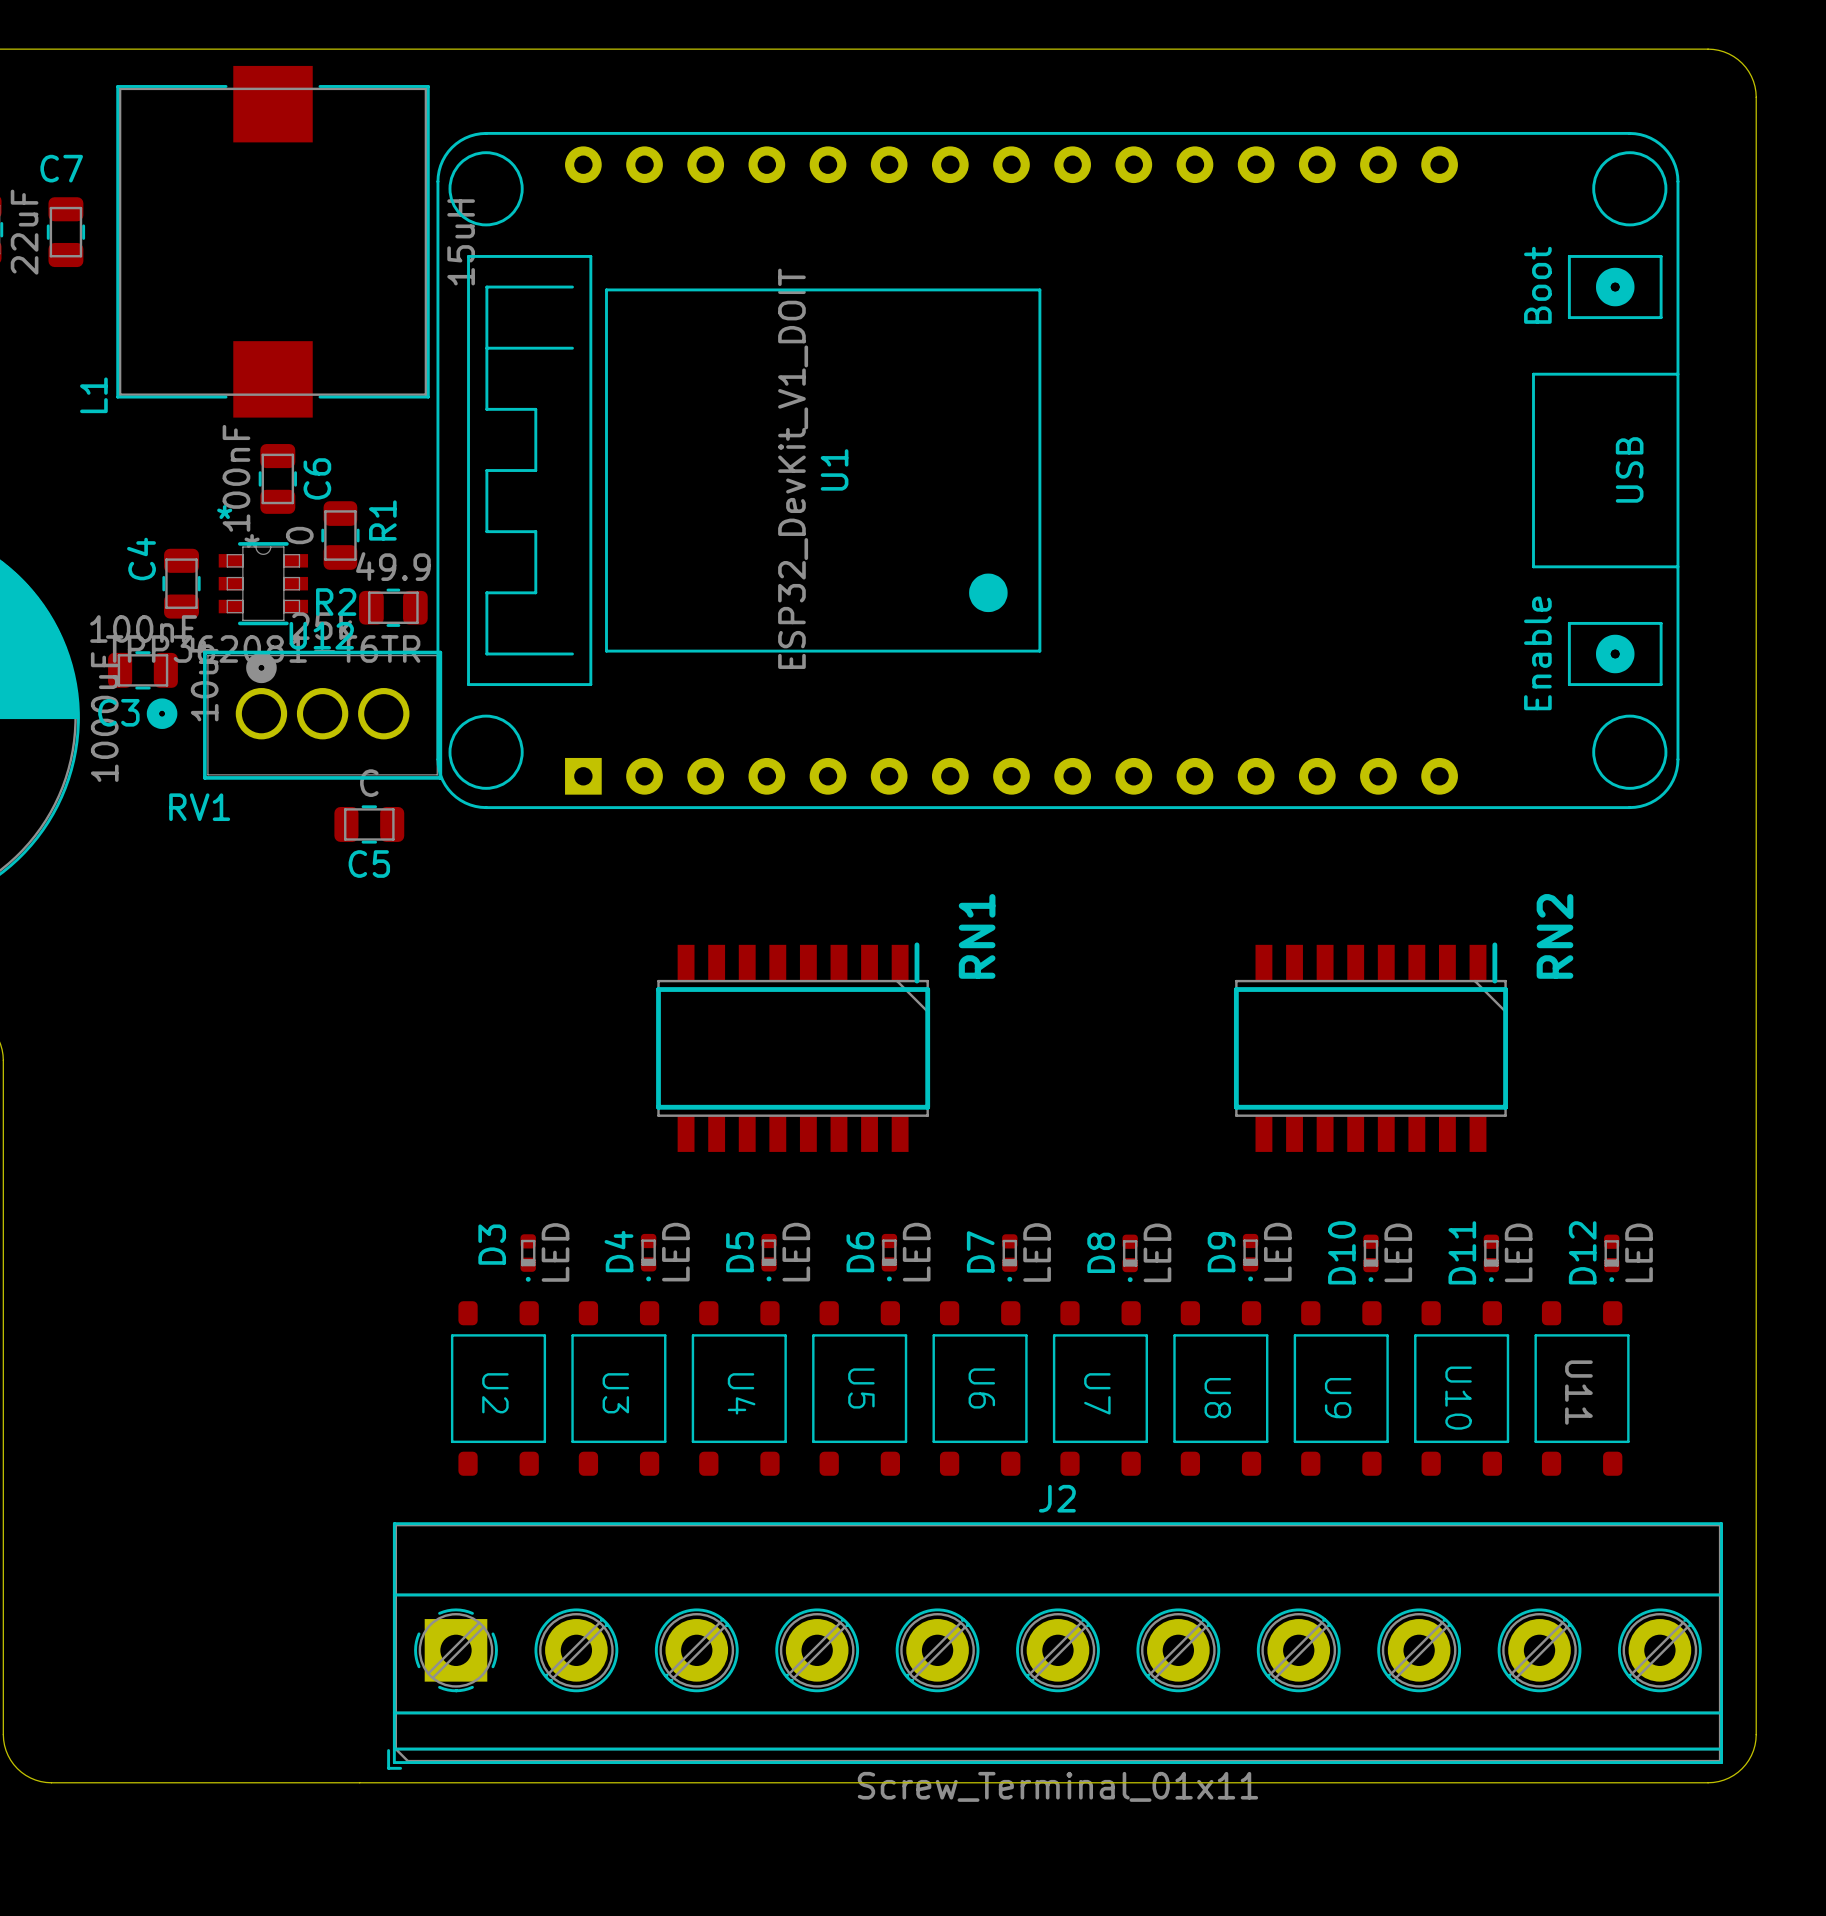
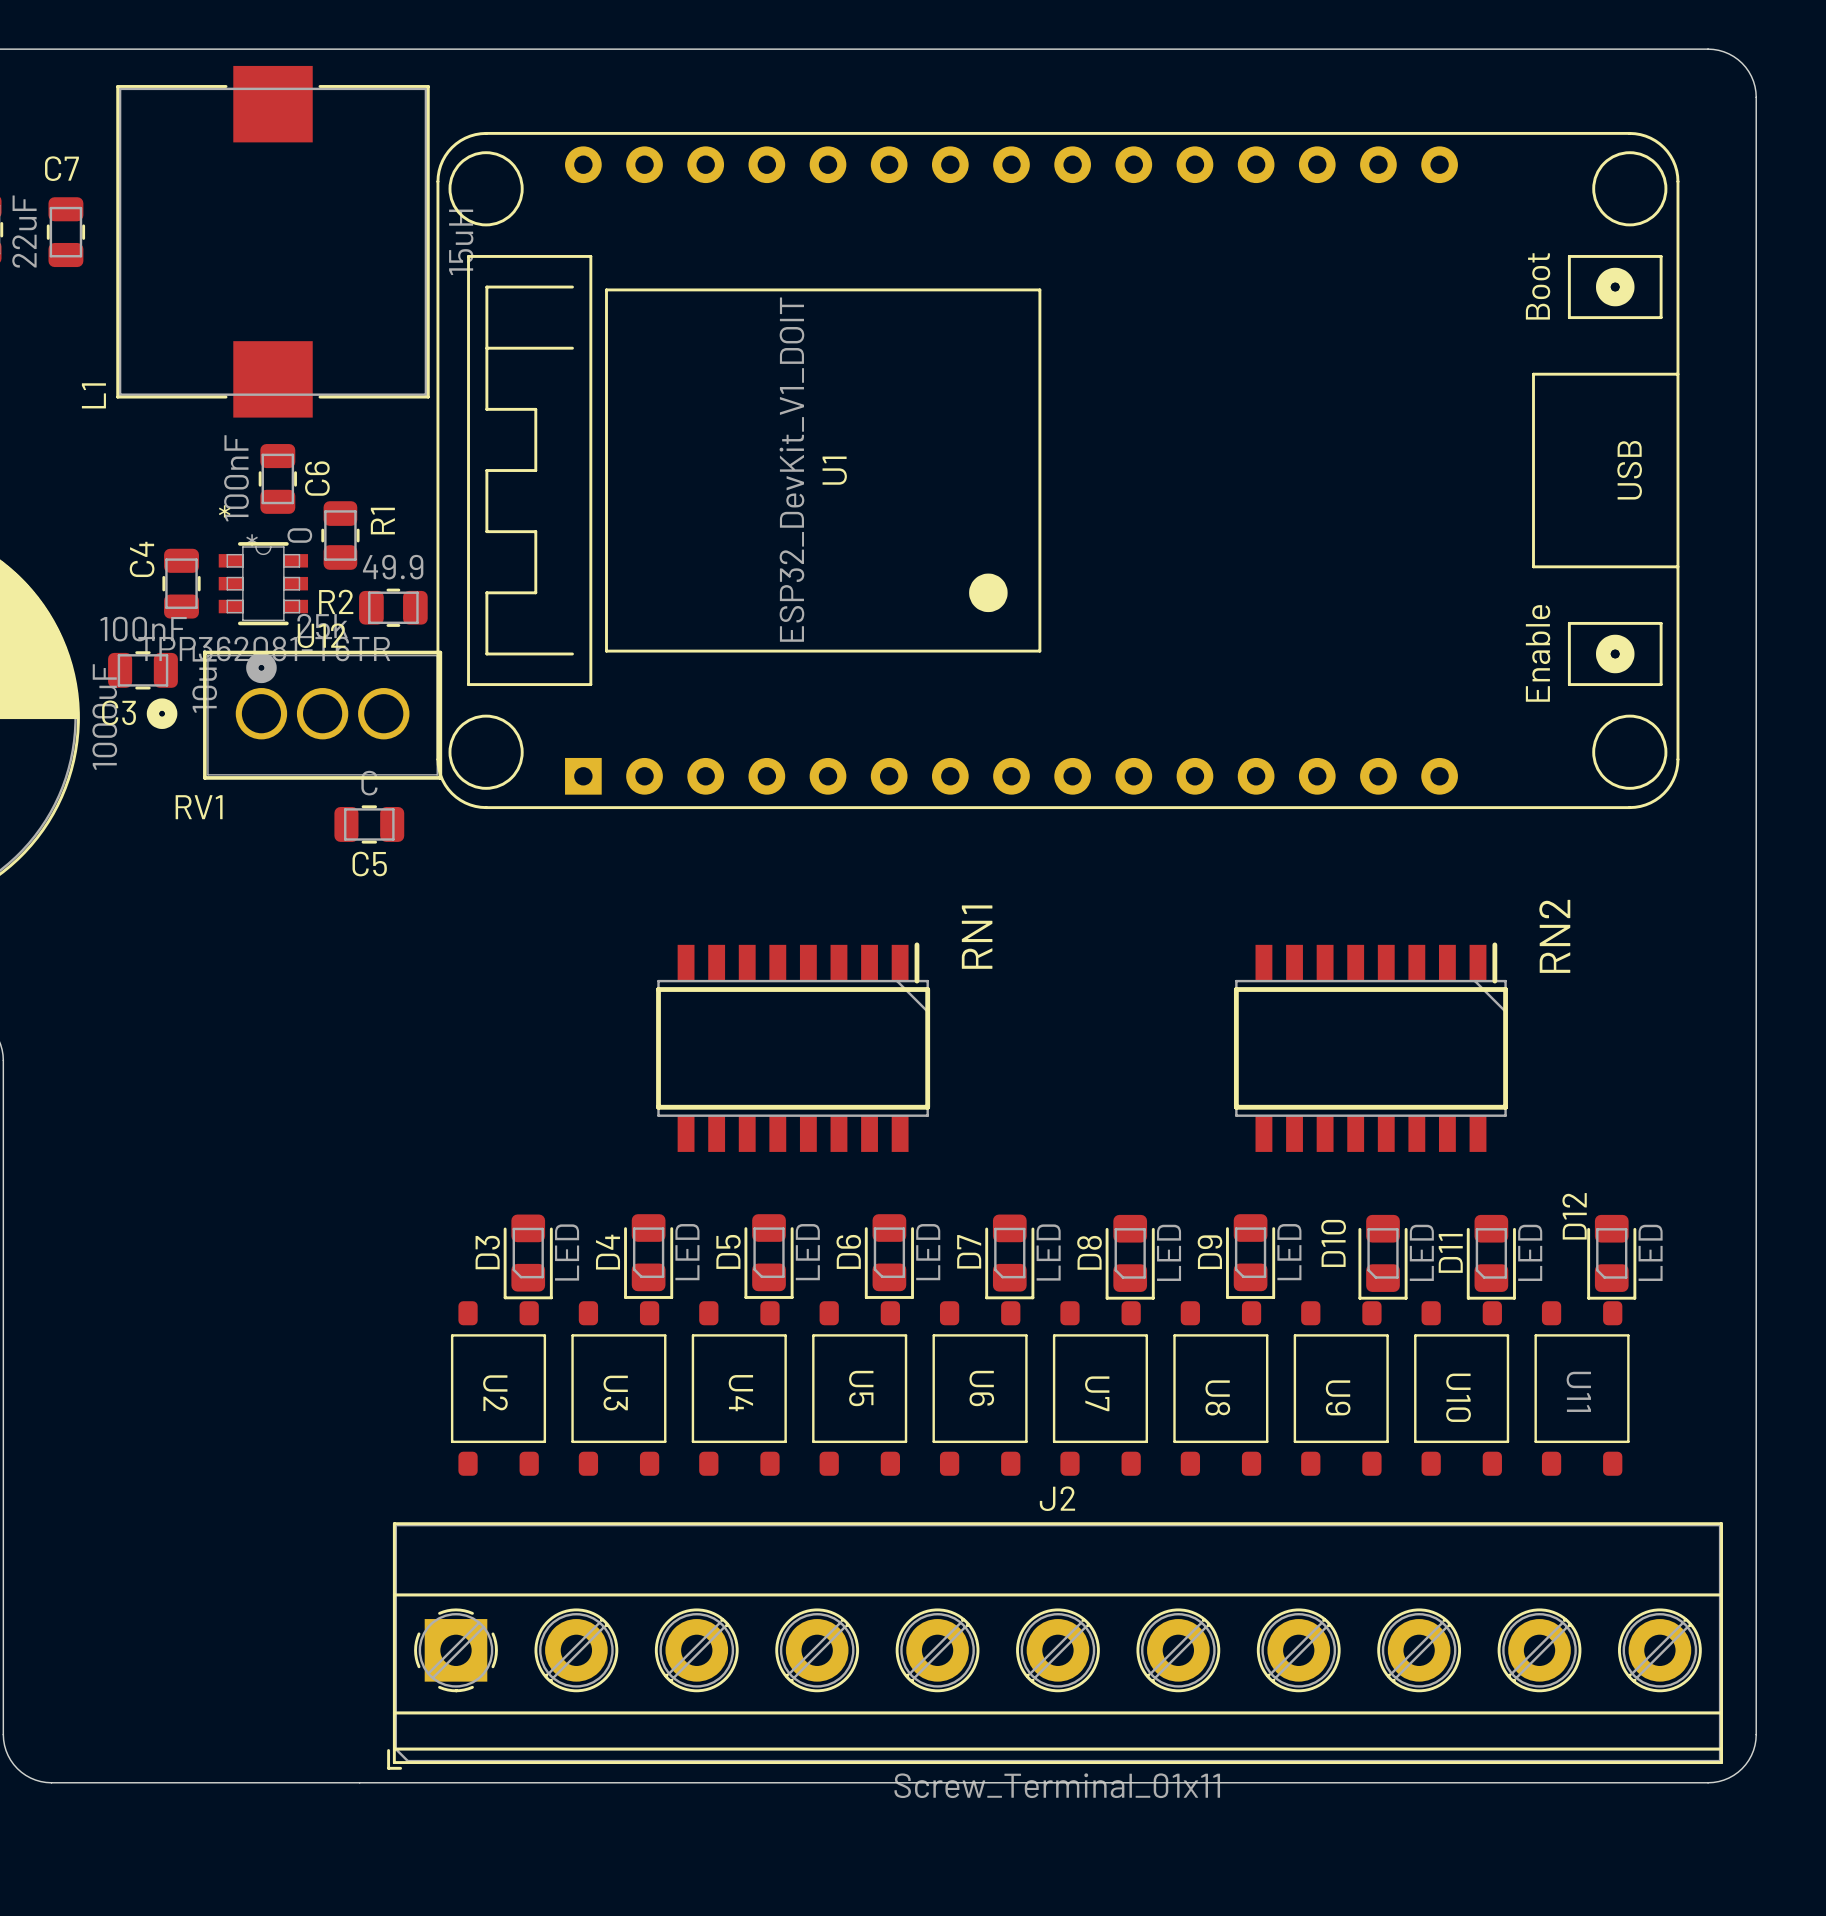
D4 footprint: [640, 1233, 657, 1282] -> [624, 1214, 674, 1299]
D5 footprint: [761, 1233, 777, 1282] -> [744, 1214, 794, 1299]
D6 footprint: [881, 1233, 898, 1282] -> [864, 1214, 914, 1299]
D9 footprint: [1242, 1233, 1259, 1282] -> [1226, 1214, 1276, 1299]
D3 footprint: [520, 1234, 536, 1282] -> [503, 1214, 553, 1300]
D7 footprint: [1002, 1234, 1018, 1282] -> [985, 1214, 1035, 1300]
D8 footprint: [1122, 1234, 1138, 1283] -> [1105, 1214, 1155, 1300]
D10 footprint: [1363, 1234, 1379, 1283] -> [1358, 1214, 1408, 1300]
D11 footprint: [1483, 1234, 1500, 1283] -> [1466, 1214, 1516, 1300]
D12 footprint: [1604, 1234, 1620, 1283] -> [1587, 1214, 1637, 1300]

